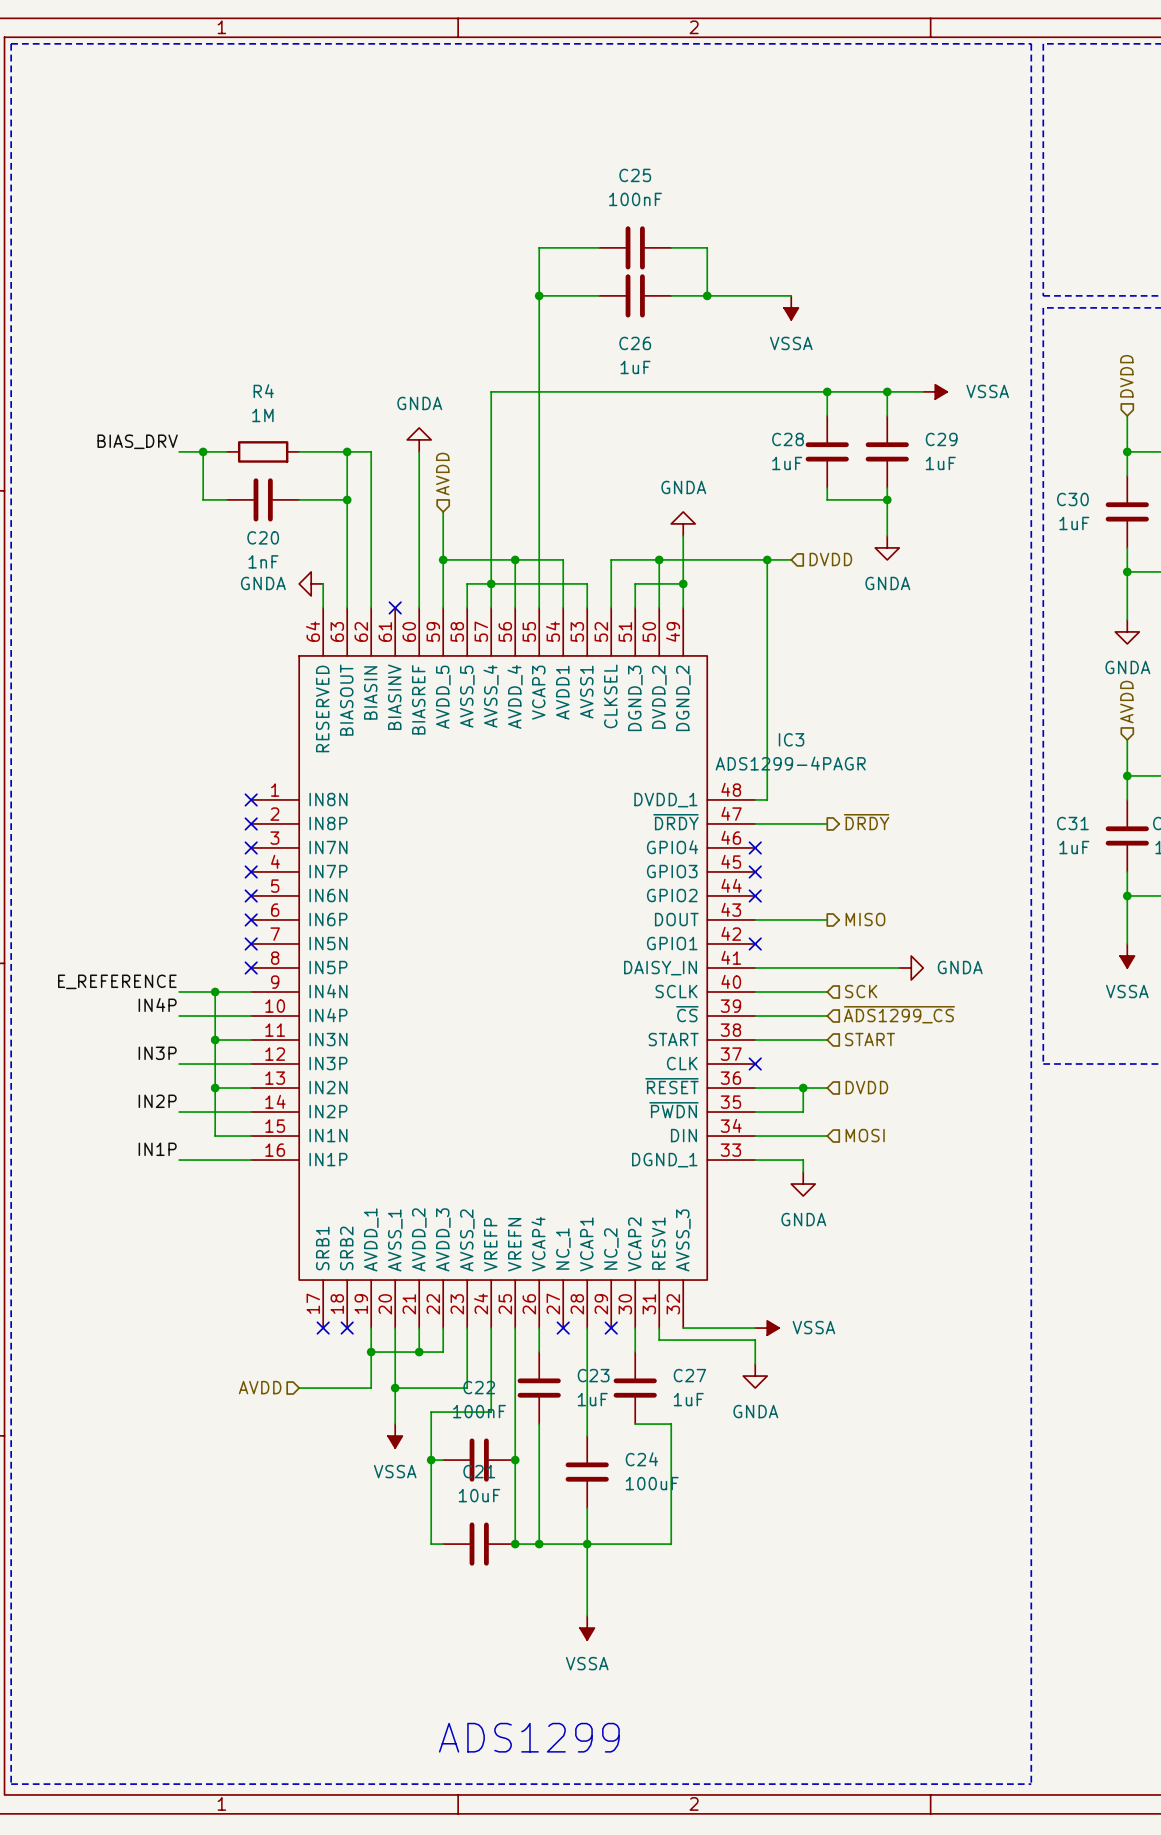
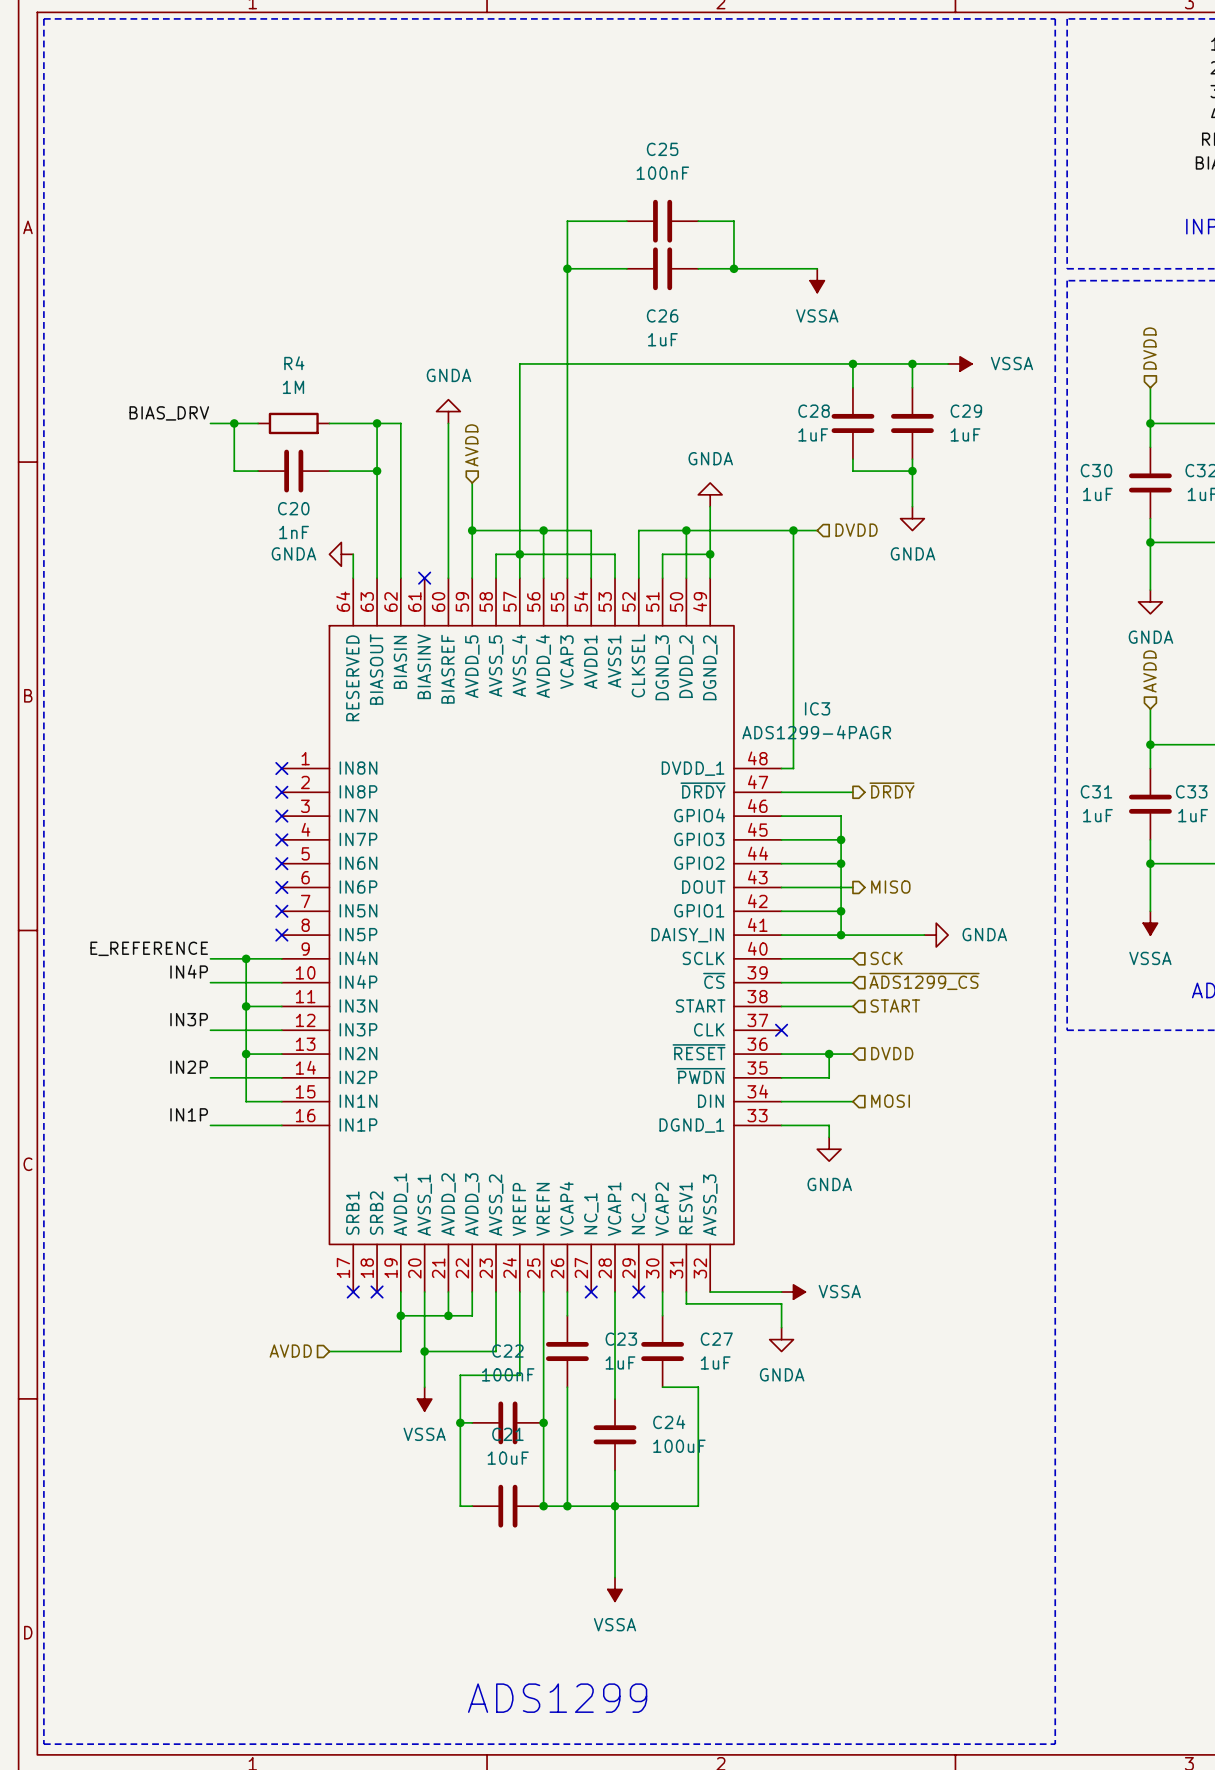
wire: none -> (781, 816) (841, 816) (841, 935)
no-connect mark: (755, 847) -> none
wire: none -> (781, 839) (841, 839)
no-connect mark: (755, 871) -> none
junction: none -> (841, 839)
wire: none -> (781, 863) (841, 863)
no-connect mark: (755, 895) -> none
junction: none -> (841, 863)
wire: none -> (781, 911) (841, 911)
no-connect mark: (755, 943) -> none
junction: none -> (841, 911)
junction: none -> (841, 935)

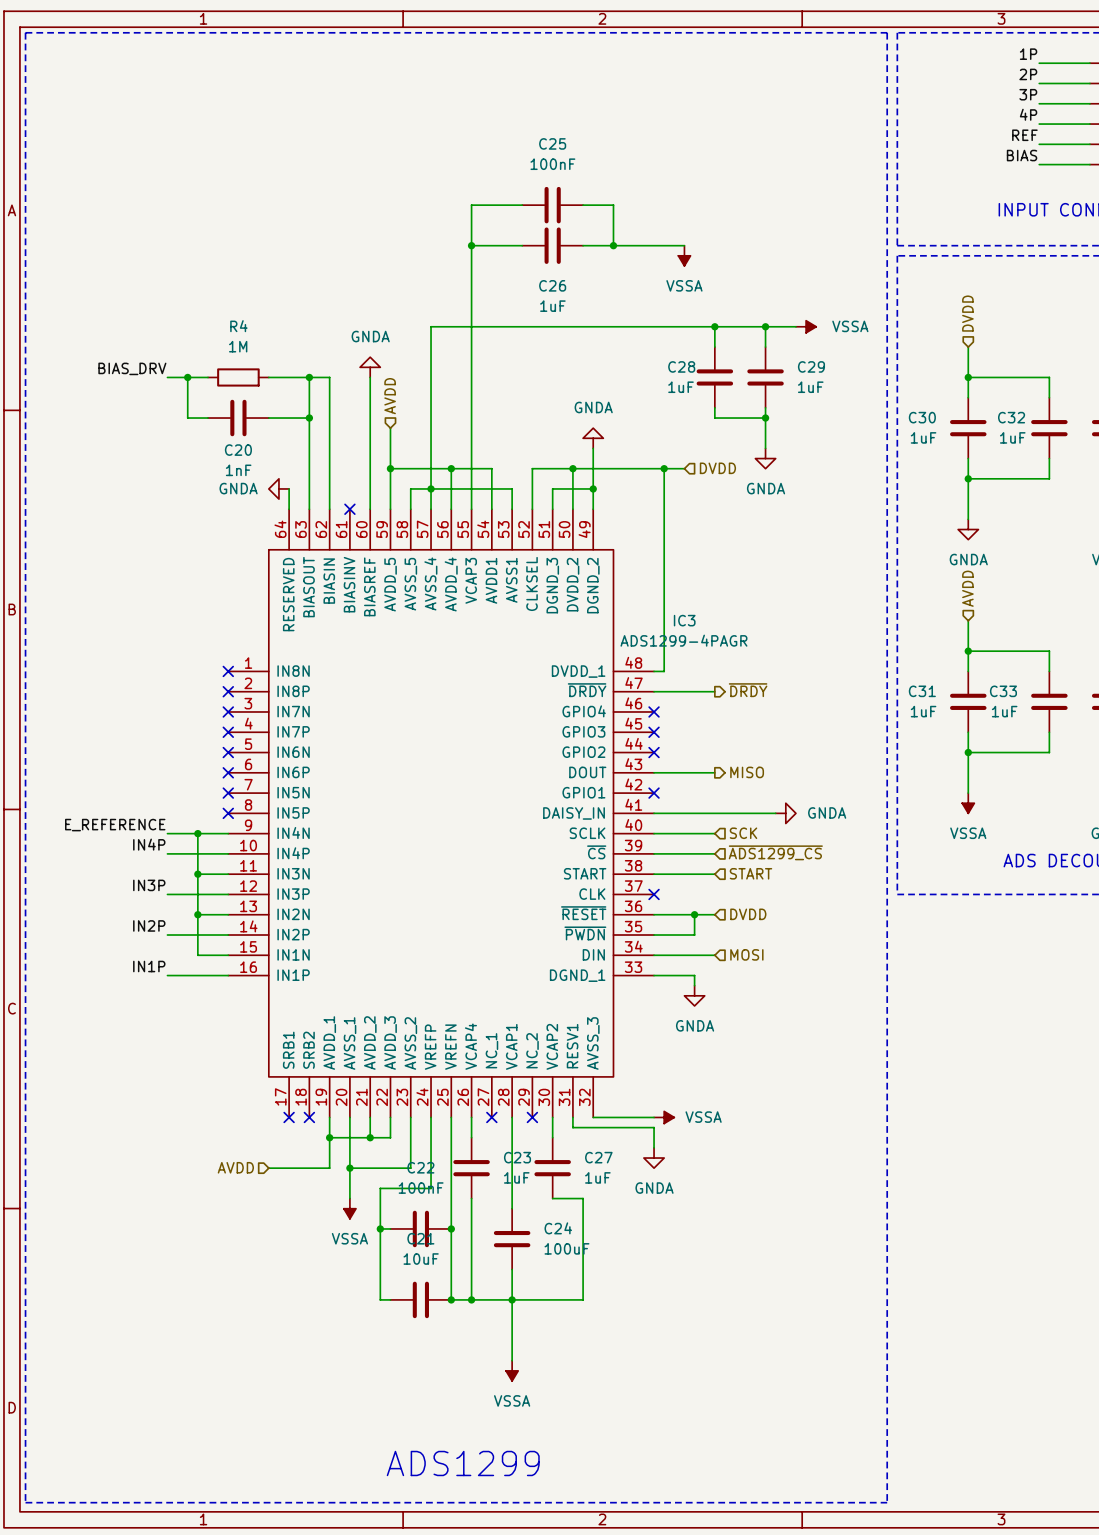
wire: (781, 816) (841, 816) (841, 935) -> none
no-connect mark: none -> (654, 711)
wire: (781, 839) (841, 839) -> none
no-connect mark: none -> (654, 732)
junction: (841, 839) -> none
wire: (781, 863) (841, 863) -> none
no-connect mark: none -> (654, 752)
junction: (841, 863) -> none
wire: (781, 911) (841, 911) -> none
no-connect mark: none -> (654, 793)
junction: (841, 911) -> none
junction: (841, 935) -> none

